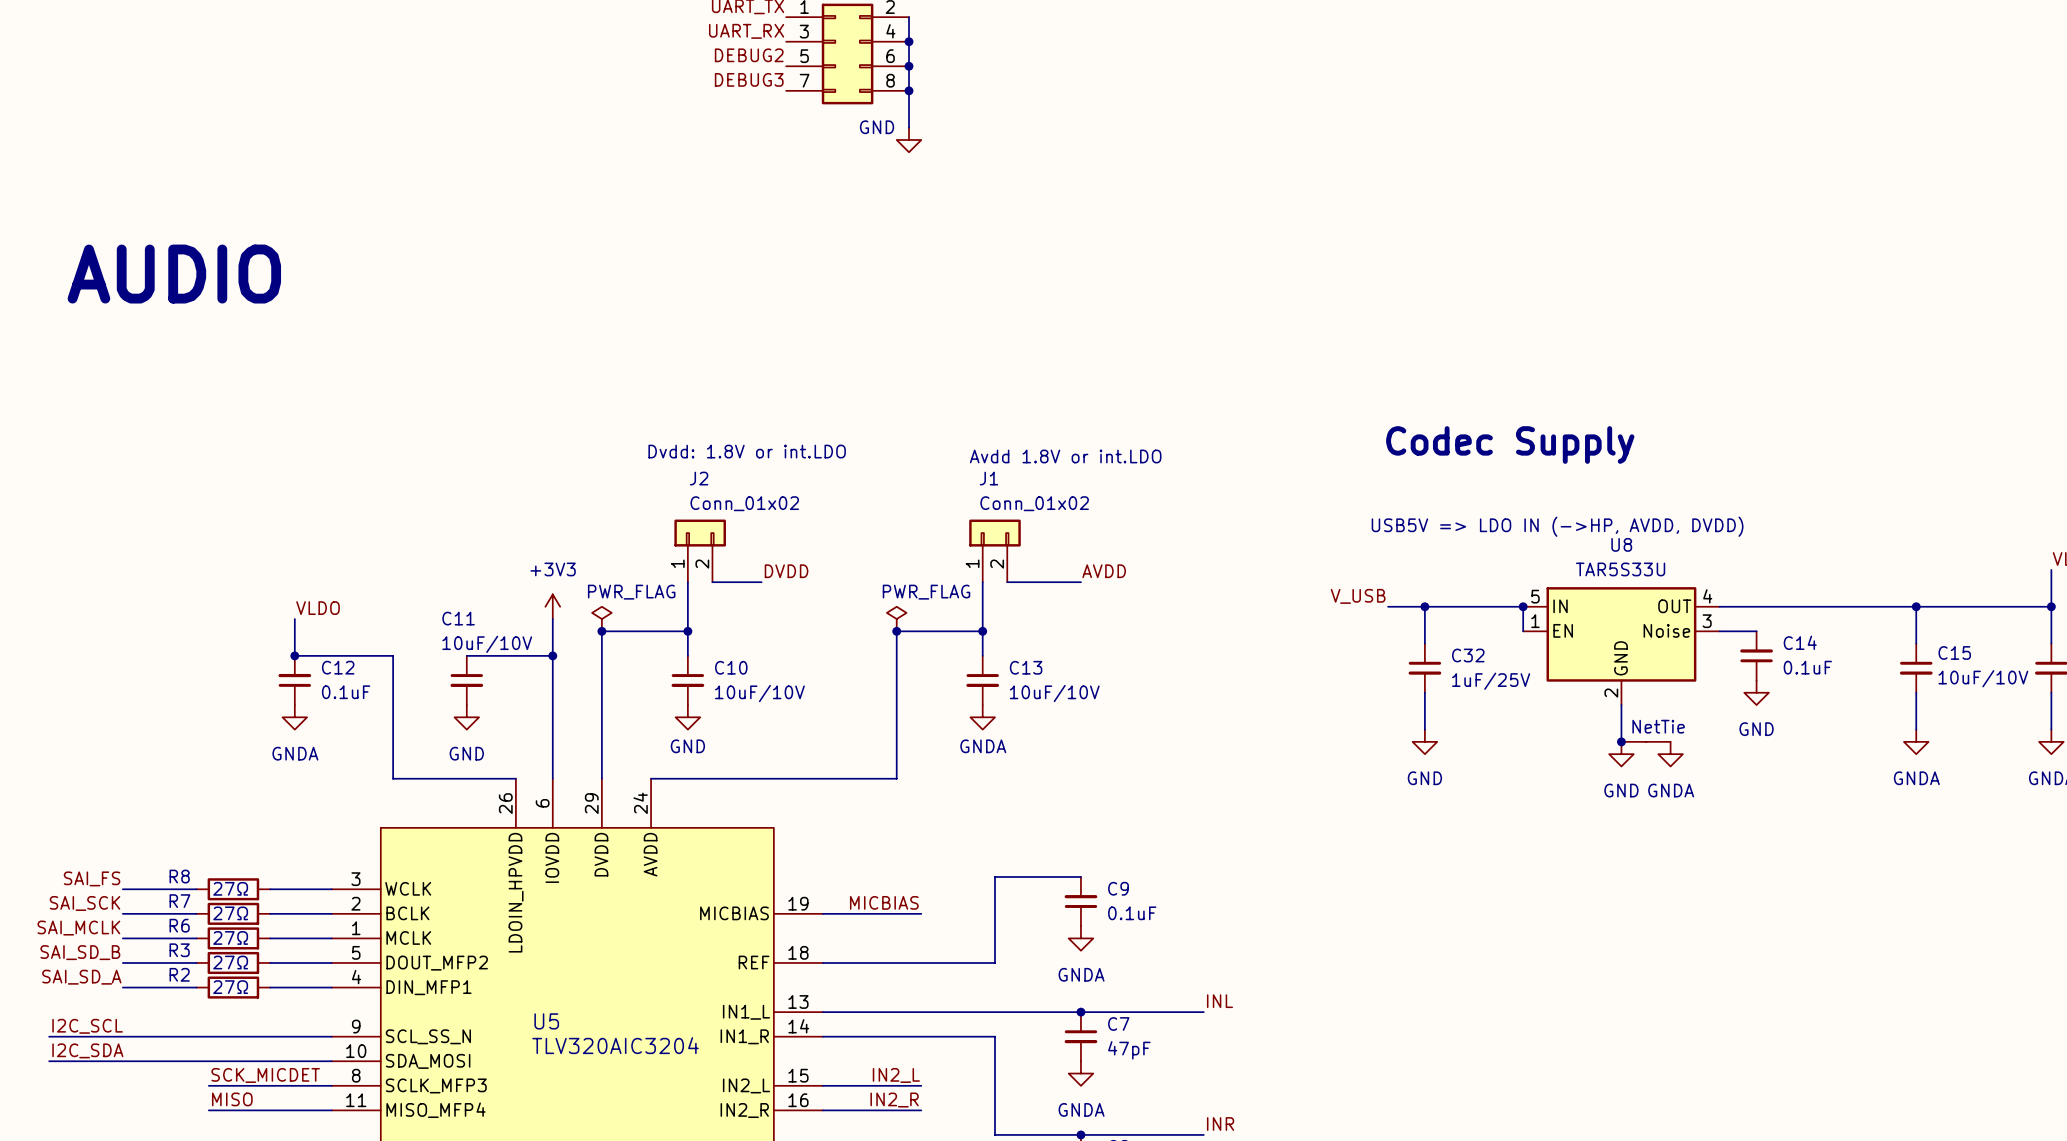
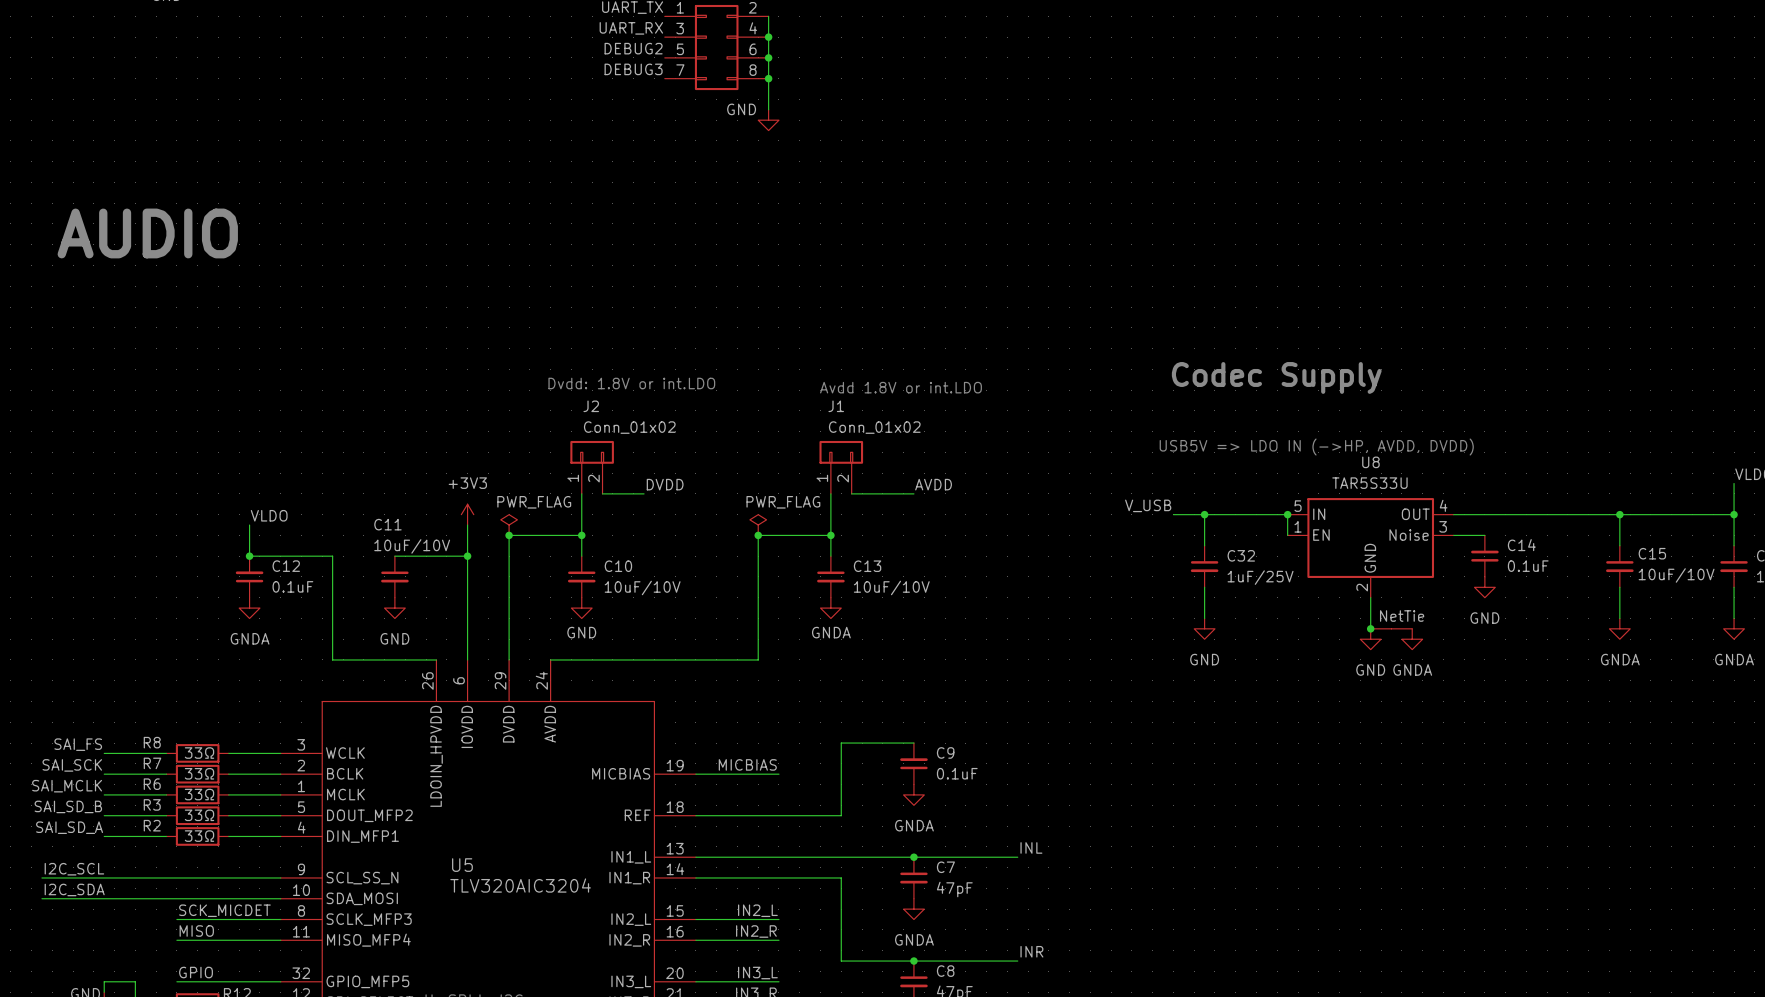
R8 text: 27Ω (230, 888) -> 33Ω (199, 753)
R7 text: 27Ω (230, 913) -> 33Ω (199, 773)
R6 text: 27Ω (230, 937) -> 33Ω (199, 794)
R3 text: 27Ω (230, 962) -> 33Ω (199, 815)
R2 text: 27Ω (230, 987) -> 33Ω (199, 836)

